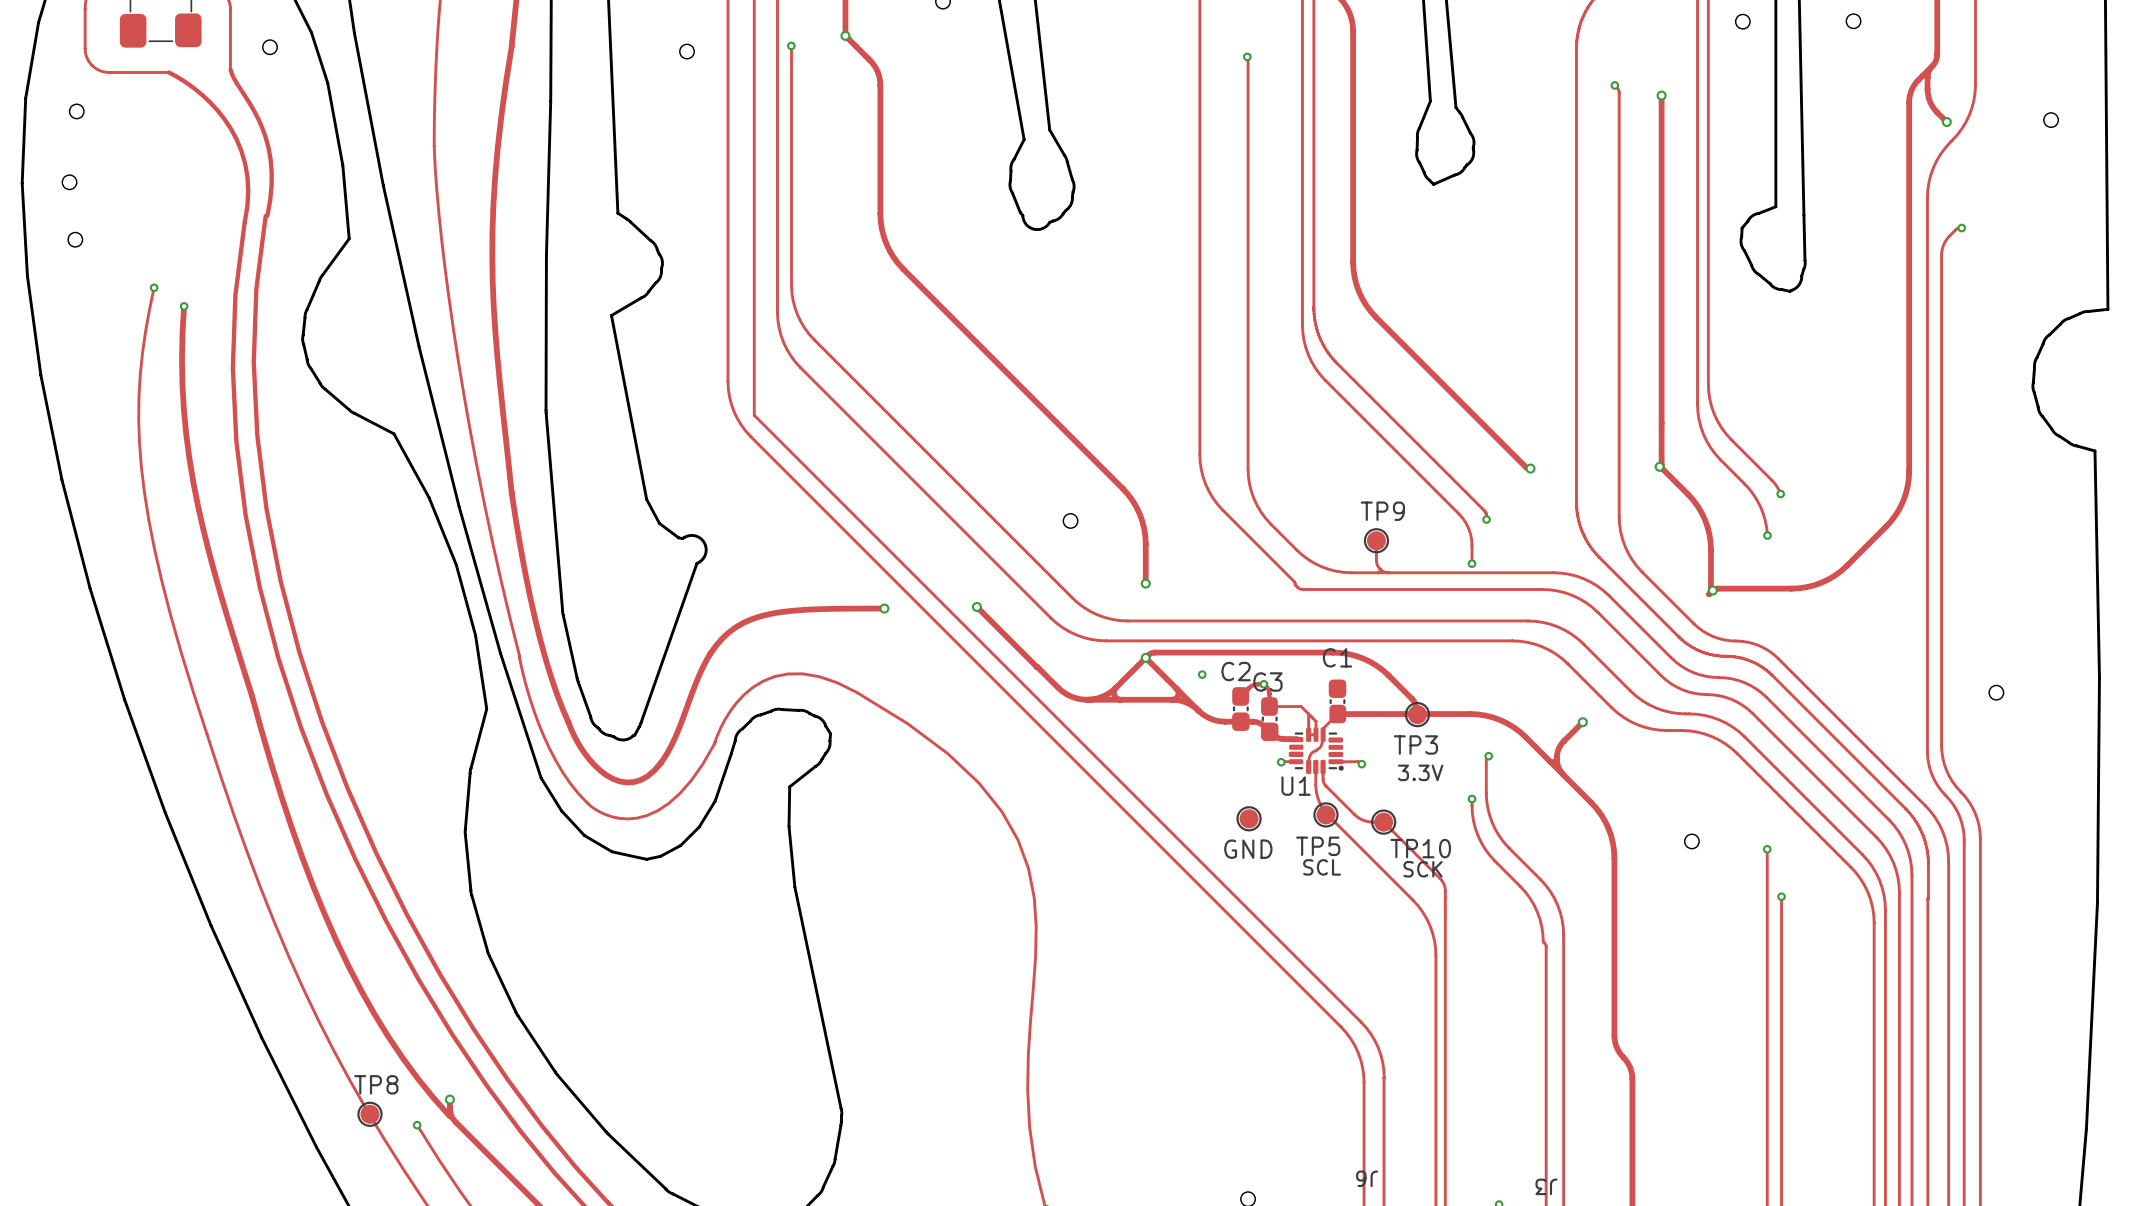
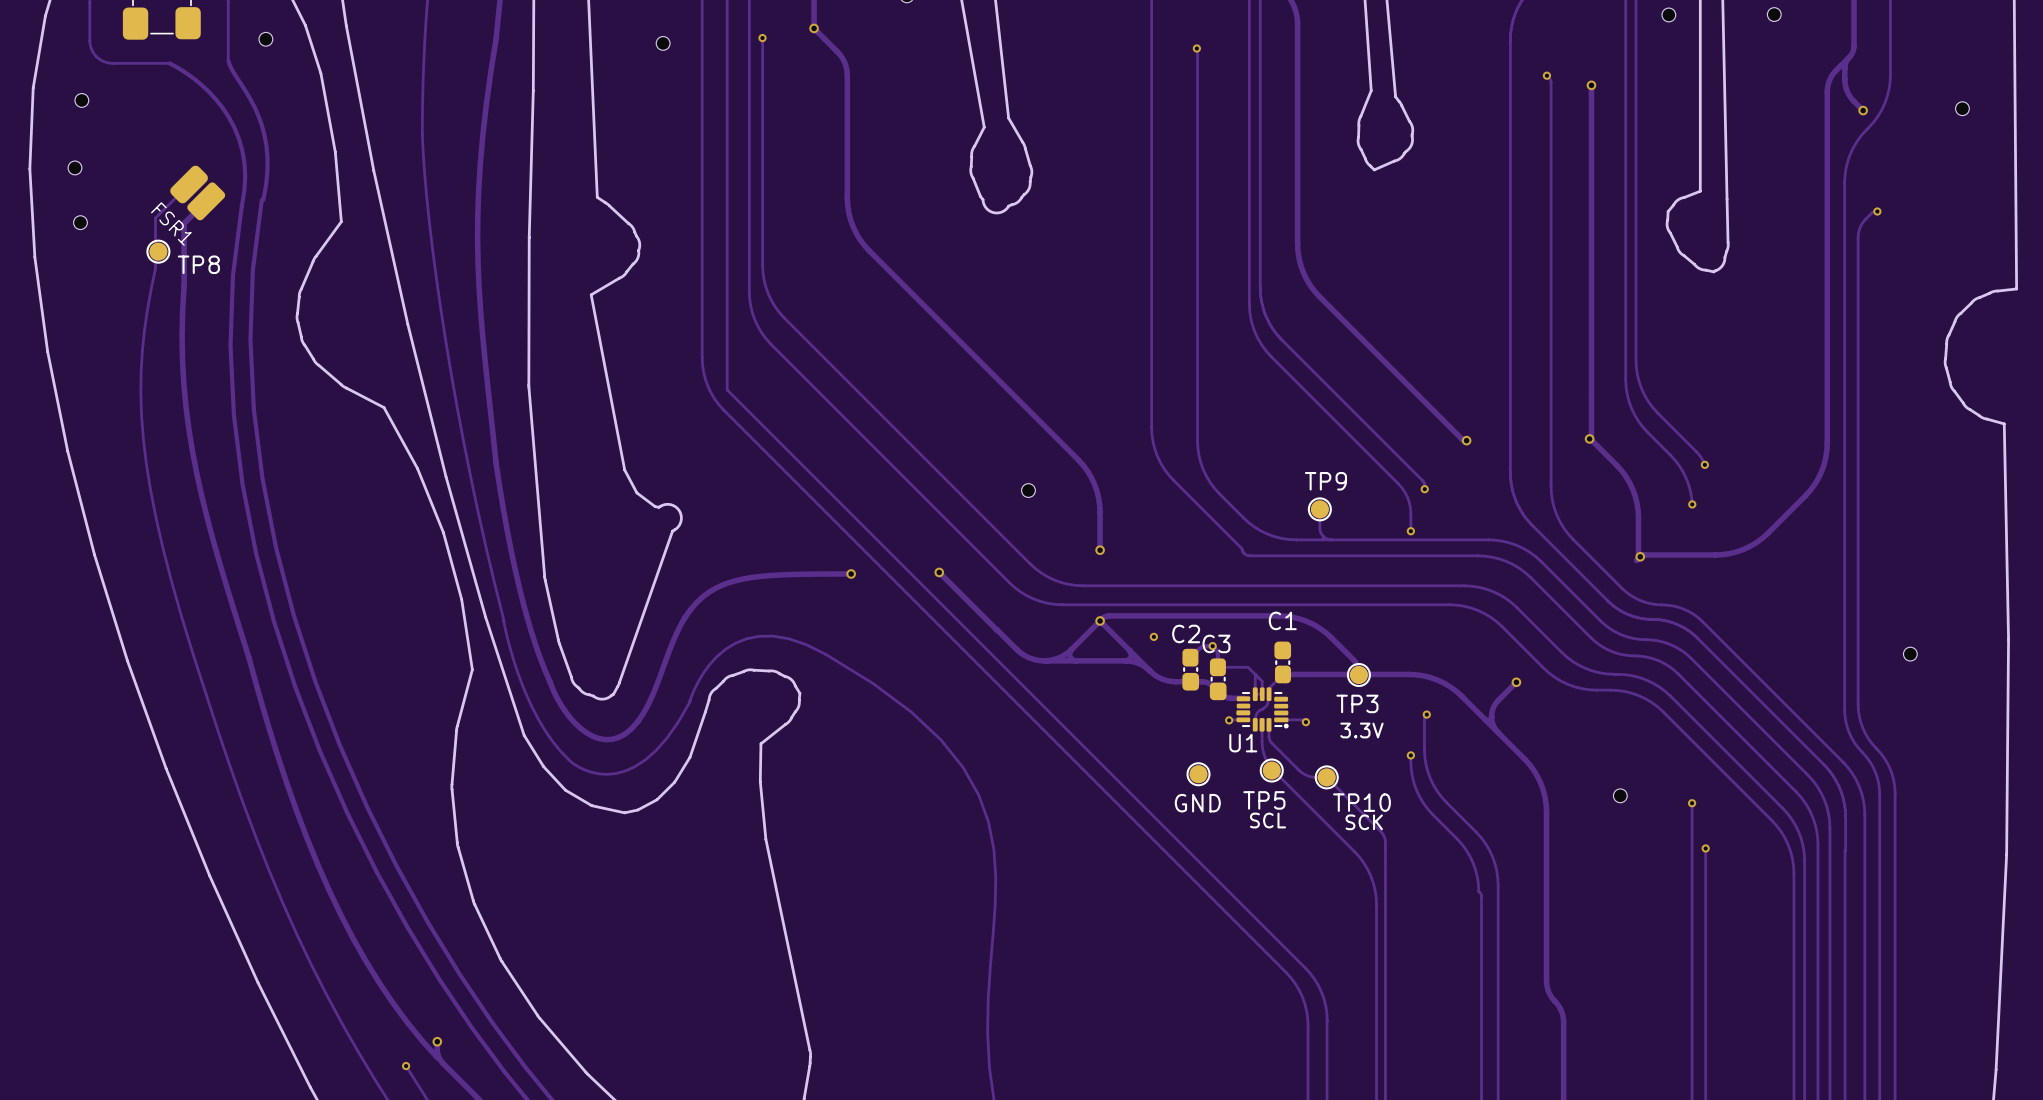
track: none -> (189, 184) (155, 218) (155, 268)
FSR1: none -> (197, 192)
track: none -> (206, 201) (184, 223) (184, 286)
via: (154, 287) -> none
via: (184, 306) -> none
TP8 name position: TP8 (376, 1084) -> TP8 (198, 264)
TP8 position: (369, 1114) -> (158, 251)

